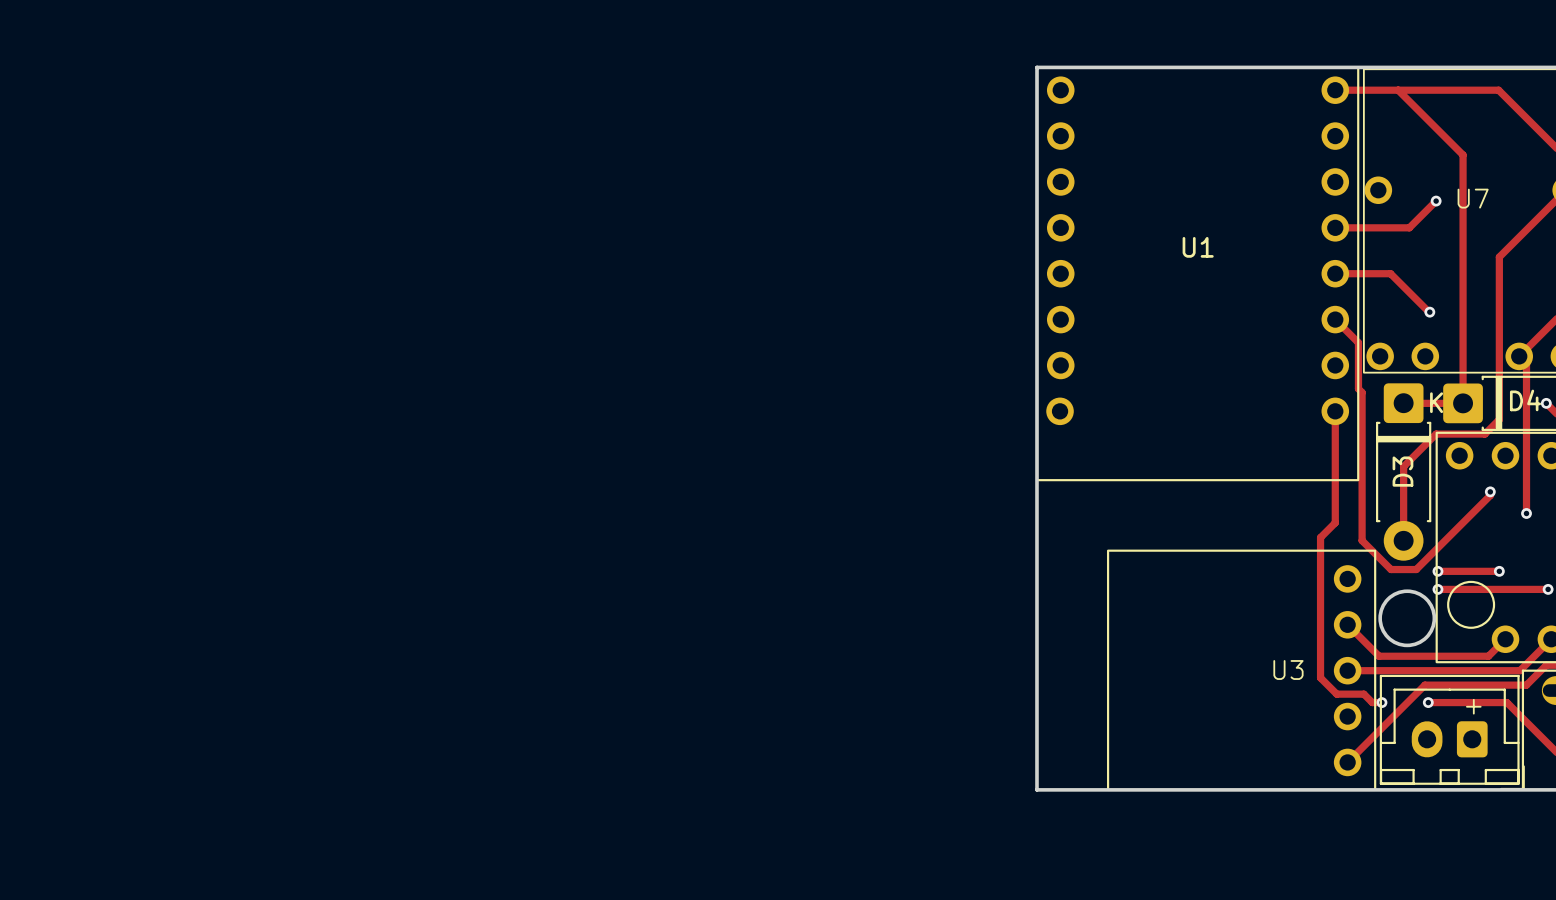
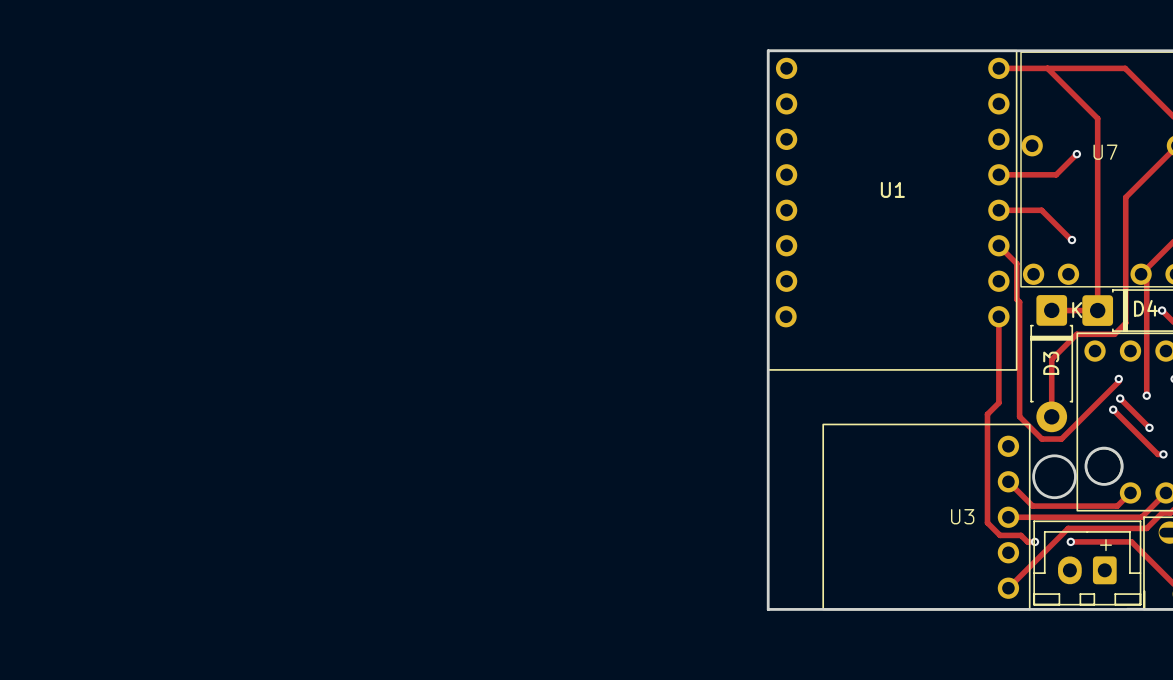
track: none -> (1120, 398) (1149, 427)
via: none -> (1120, 398)
via: none -> (1113, 409)
via: none -> (1149, 427)
track: (1437, 571) (1499, 571) -> none
via: (1437, 571) -> none
via: (1499, 571) -> none
round board edge: none -> [1084, 446, 1124, 486]
track: (1437, 589) (1540, 589) -> (1113, 409) (1157, 454)
via: (1437, 589) -> none

